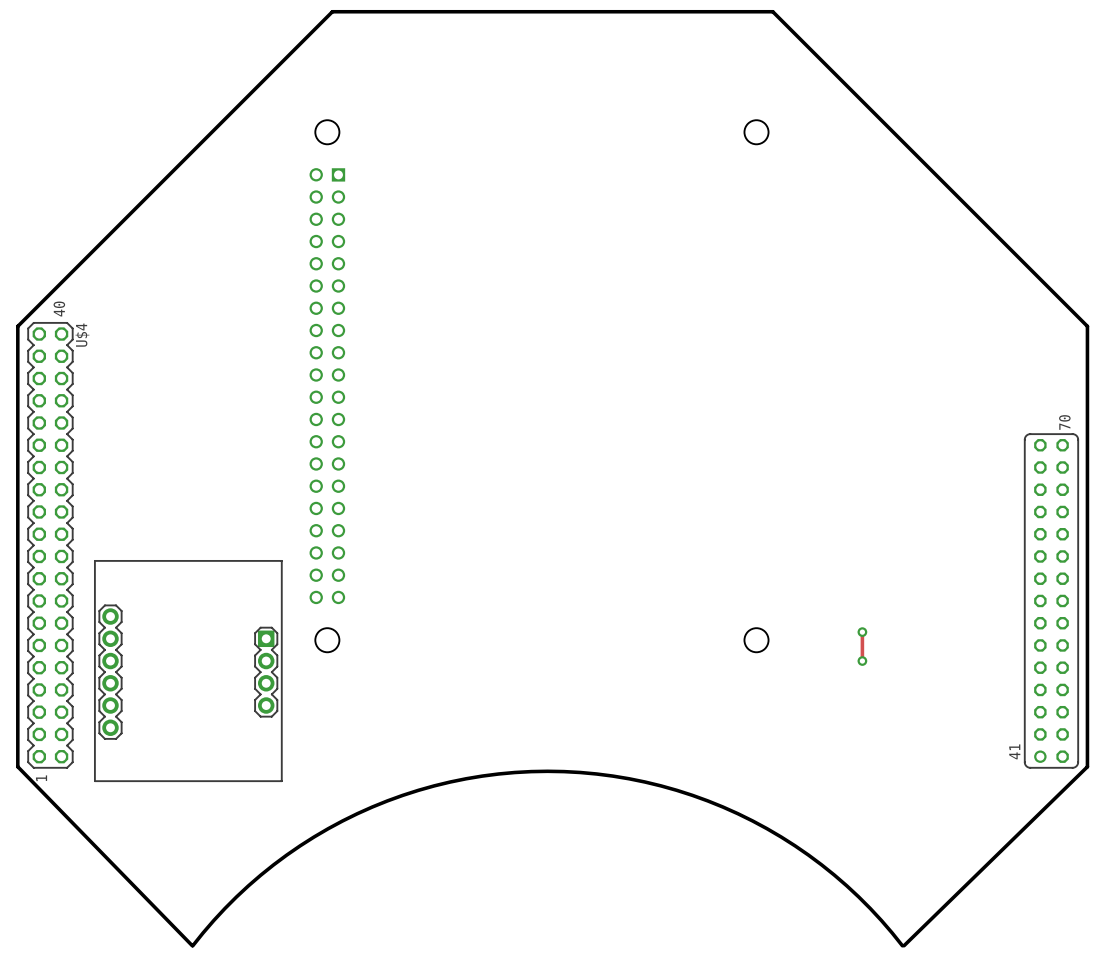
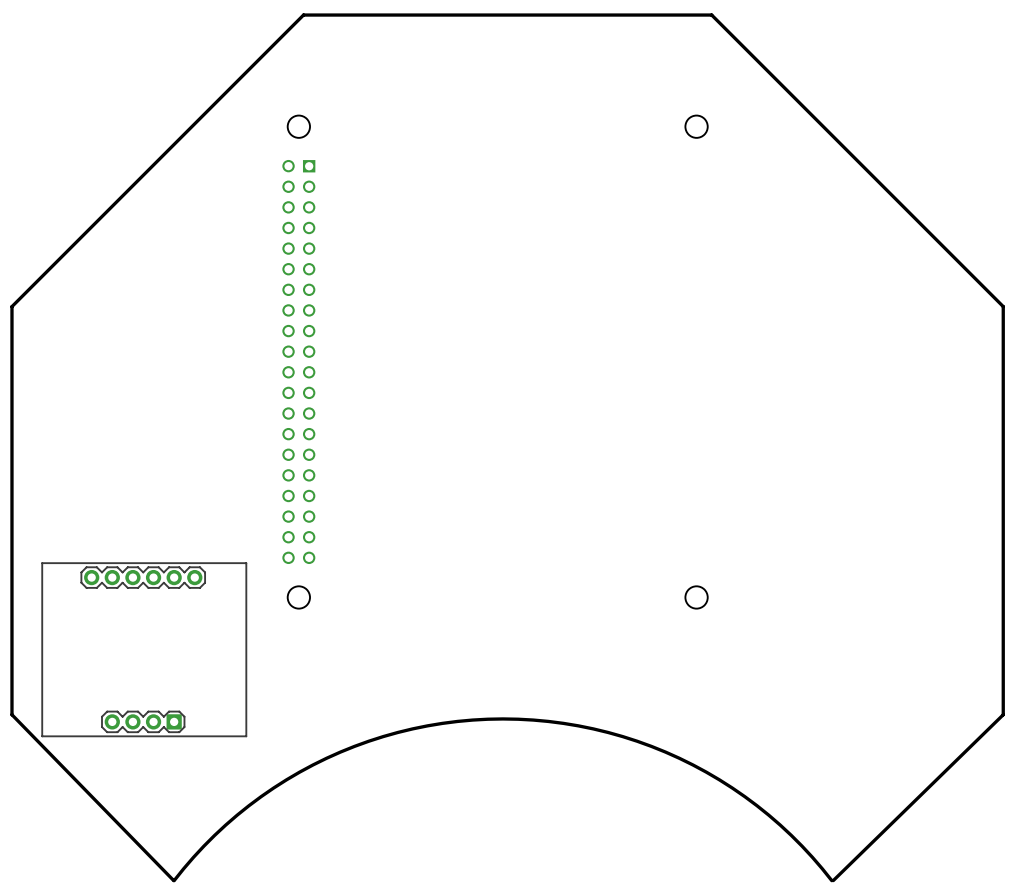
U$4: (553, 545) -> none
track: (862, 632) (862, 661) -> none
via: (862, 632) -> none
via: (862, 661) -> none
part rotation: 0° (188, 671) -> 90° clockwise (144, 649)

